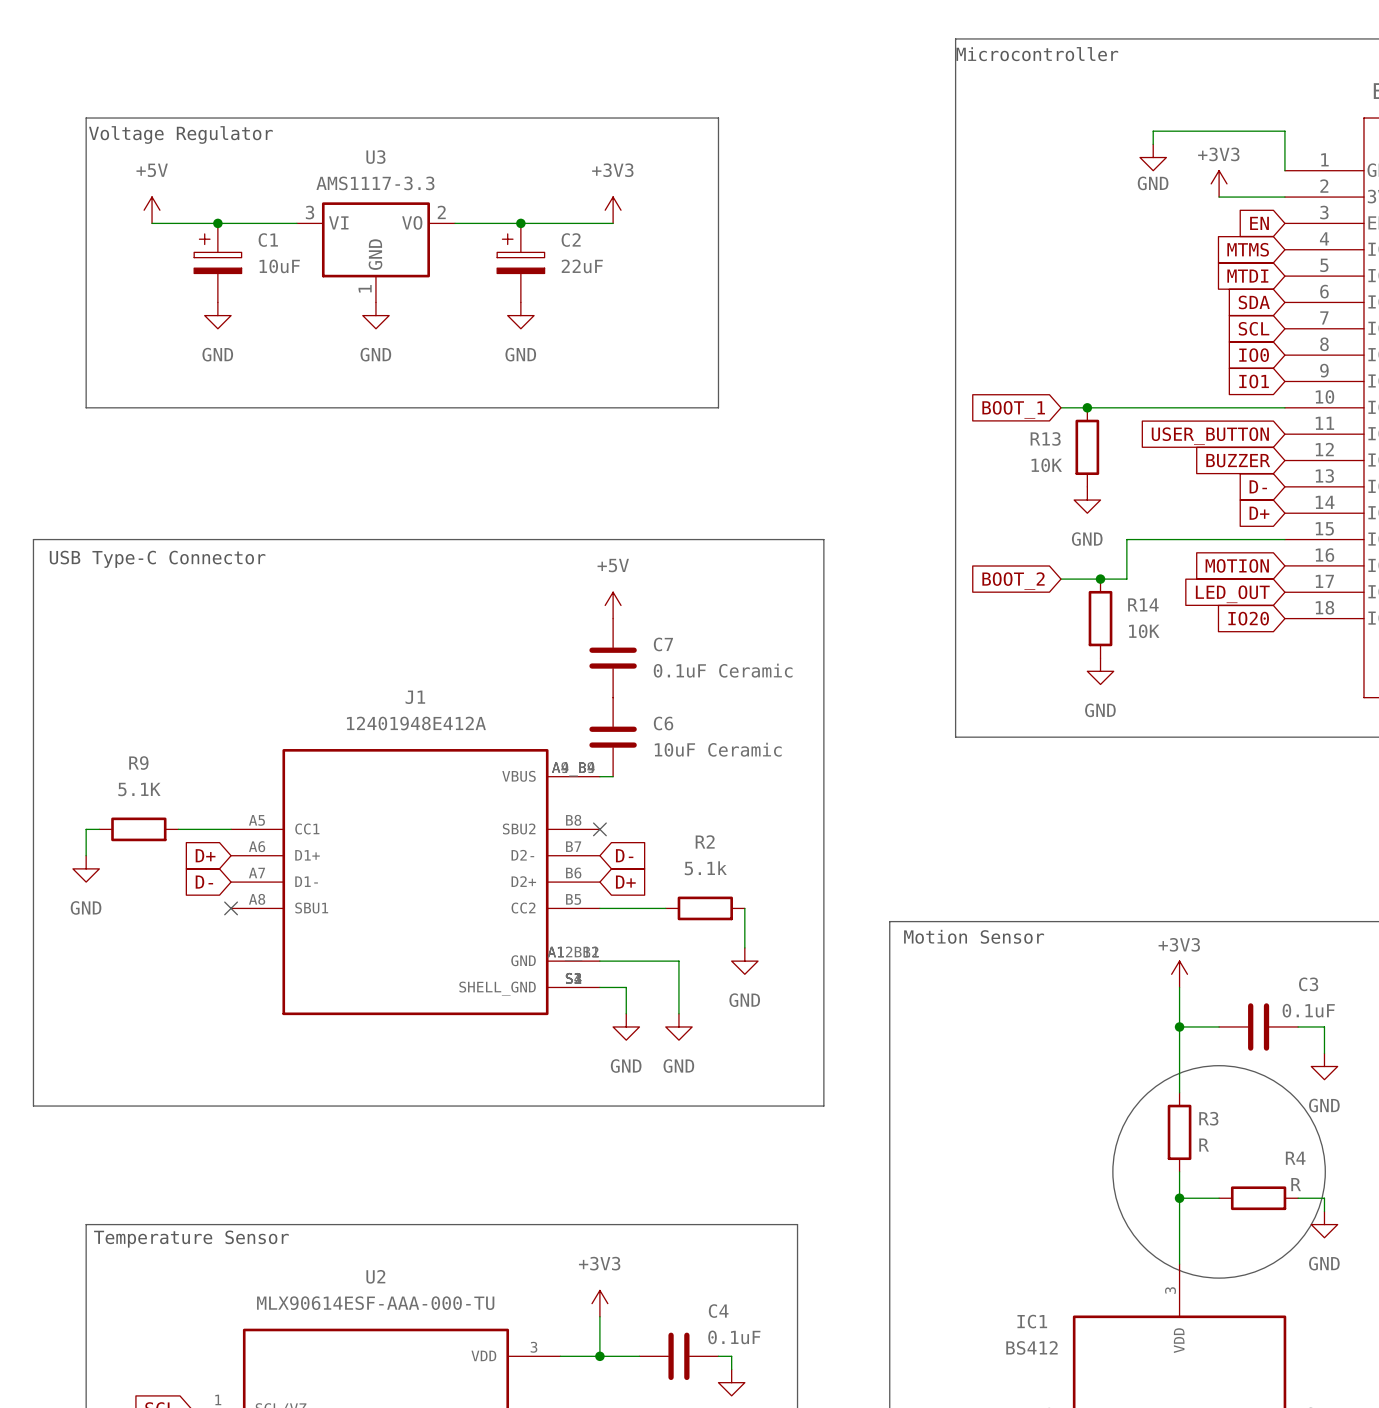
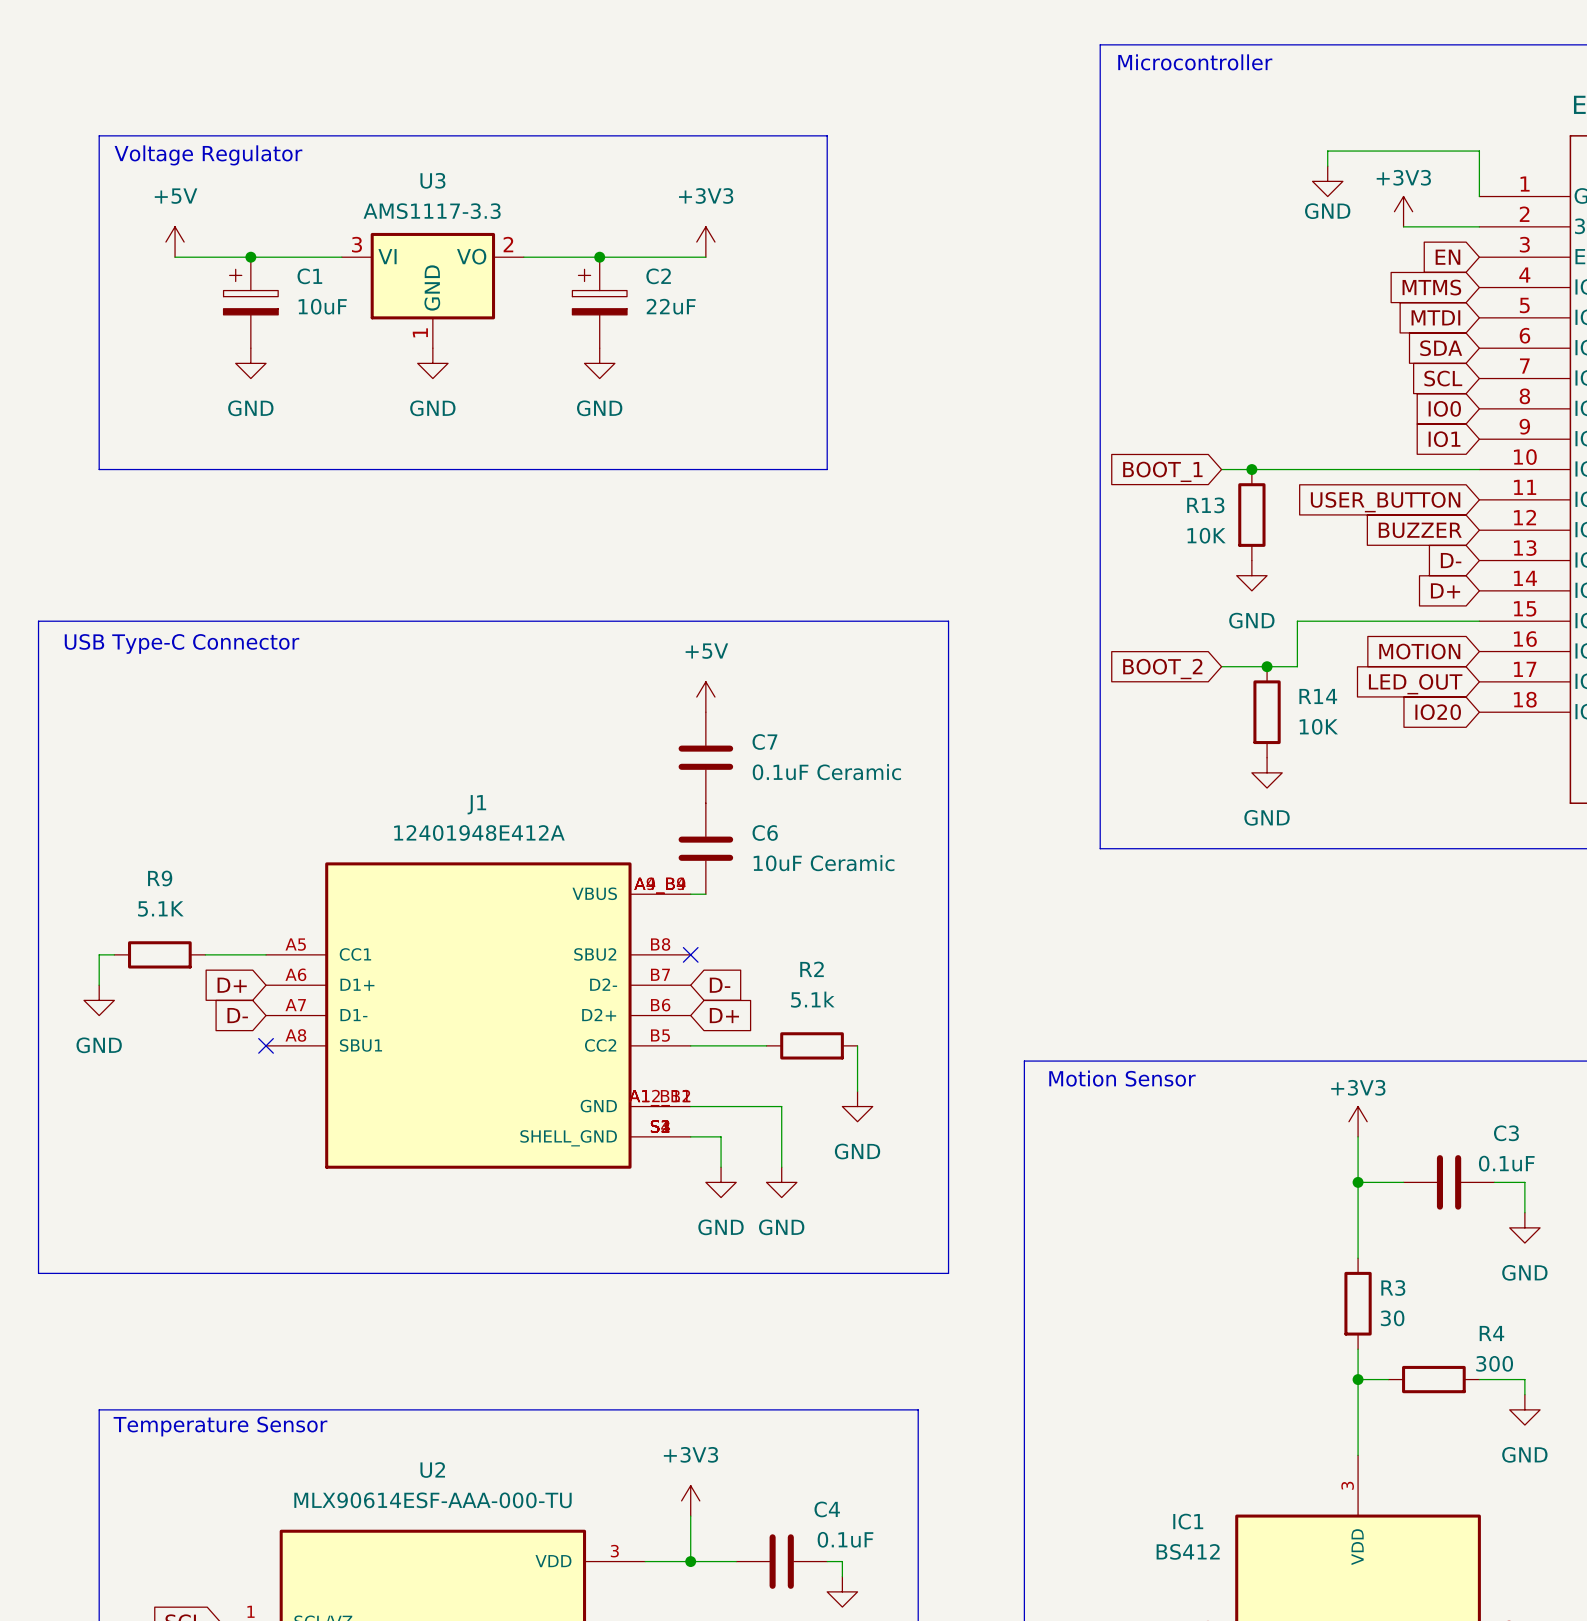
drawing: [1112, 1065, 1326, 1279] -> none
R3 value: R (1204, 1145) -> 30 (1392, 1318)
R4 value: R (1296, 1184) -> 300 (1494, 1363)
R4 position: (1258, 1198) -> (1433, 1379)

